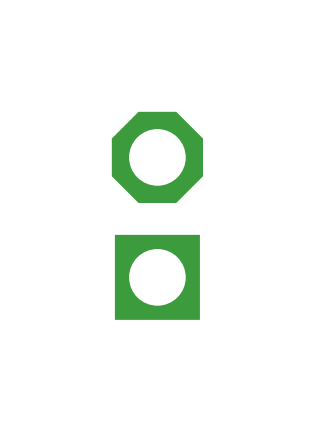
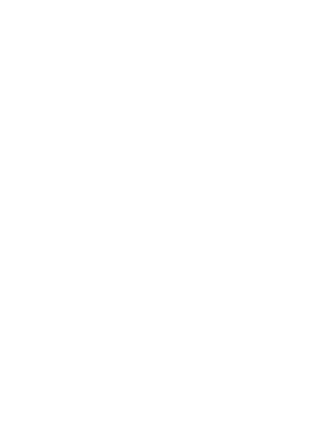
part: (157, 215) -> none

